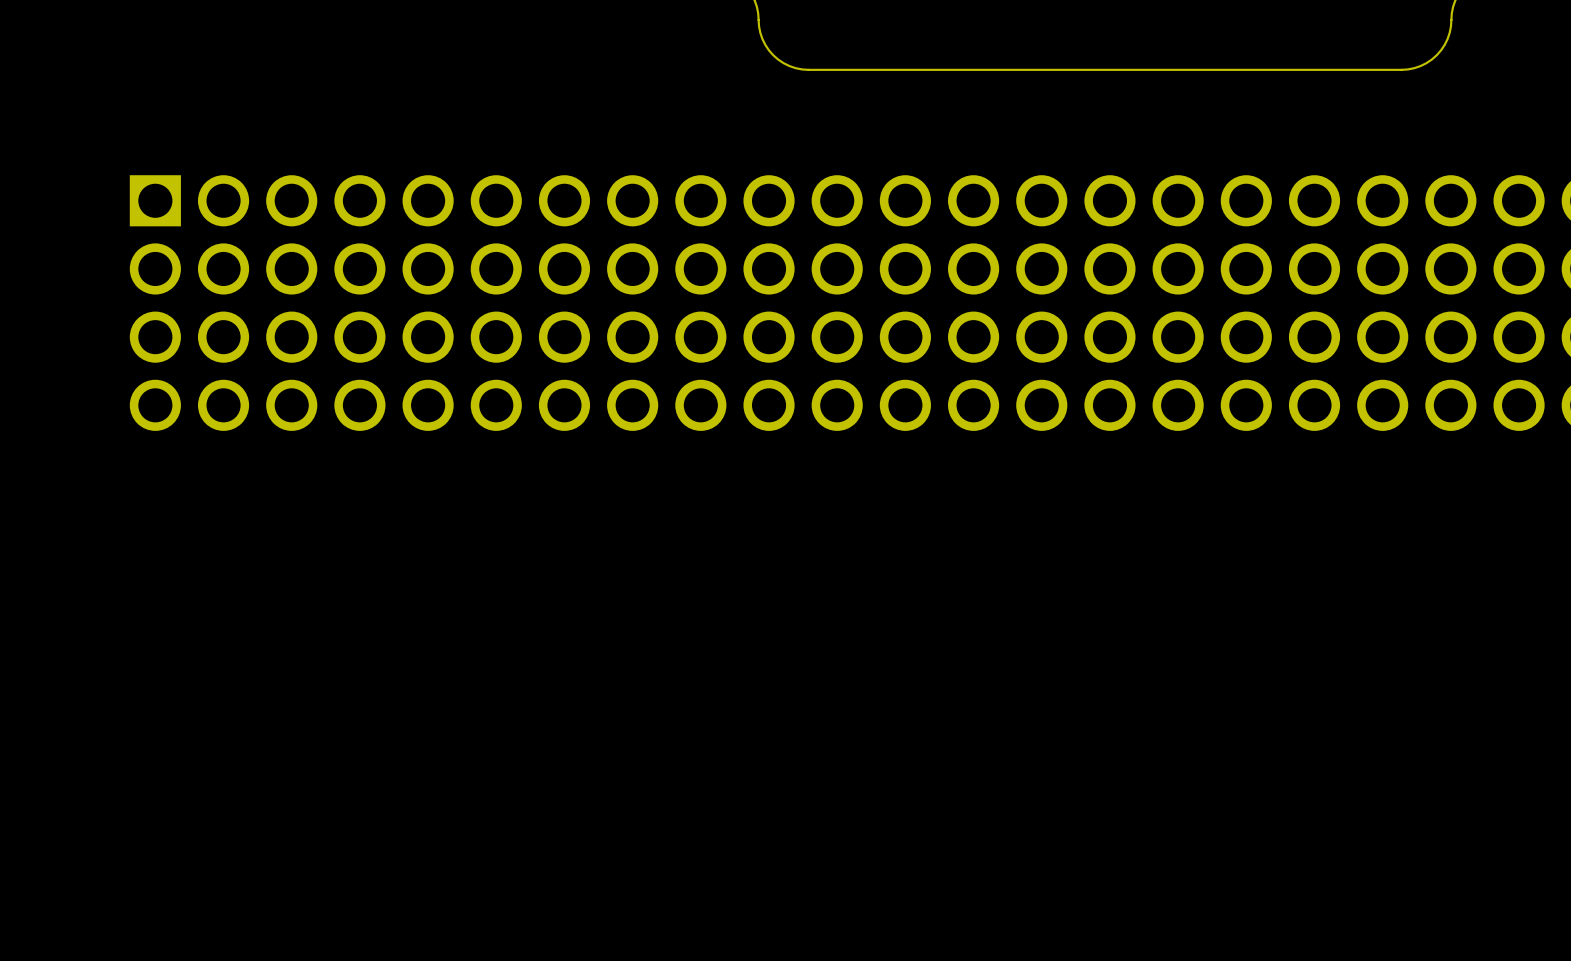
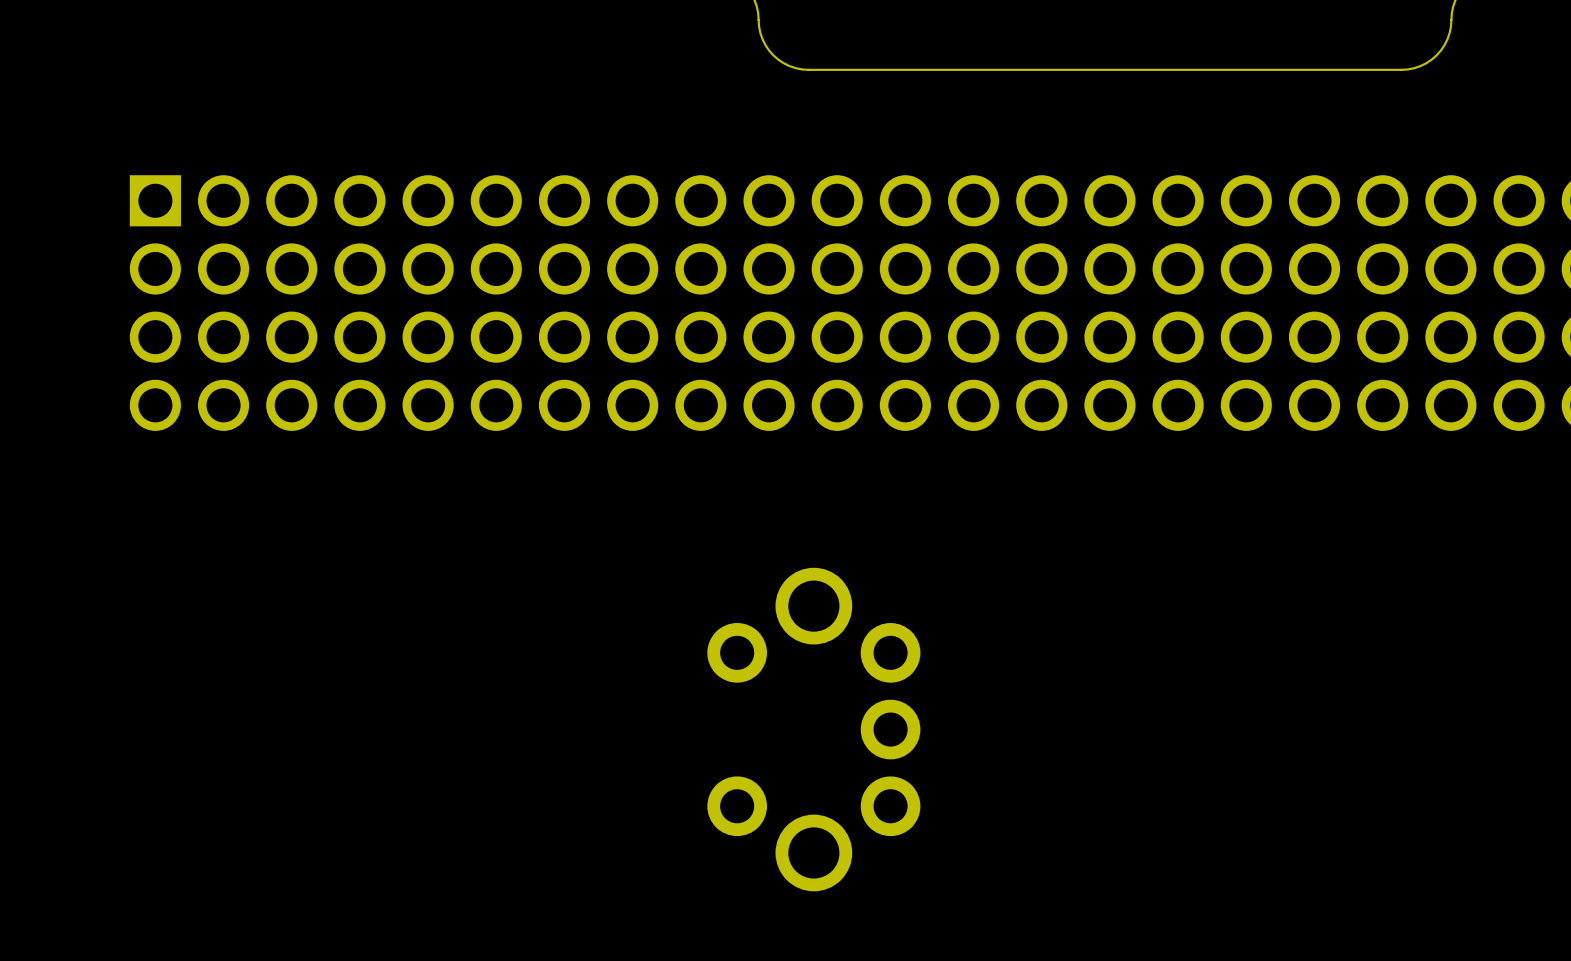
part: none -> (813, 729)

